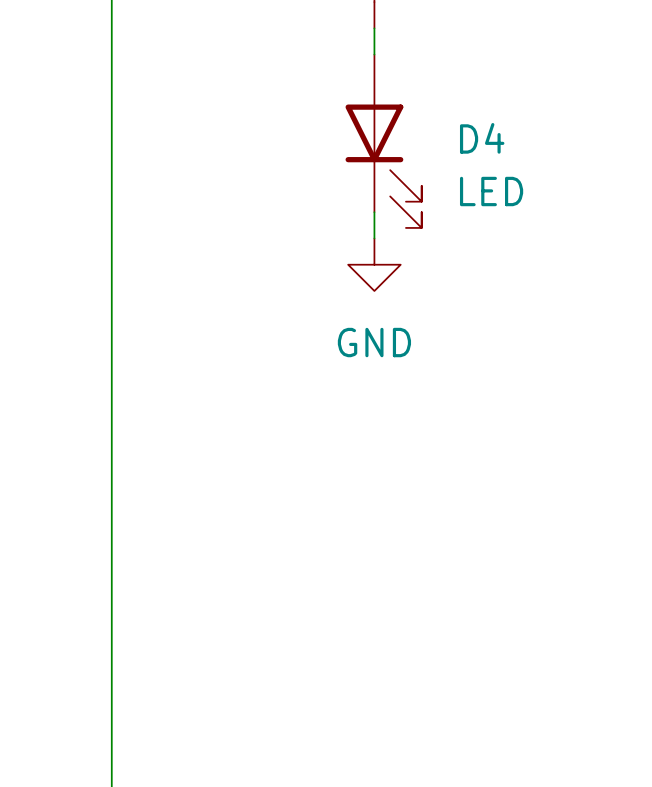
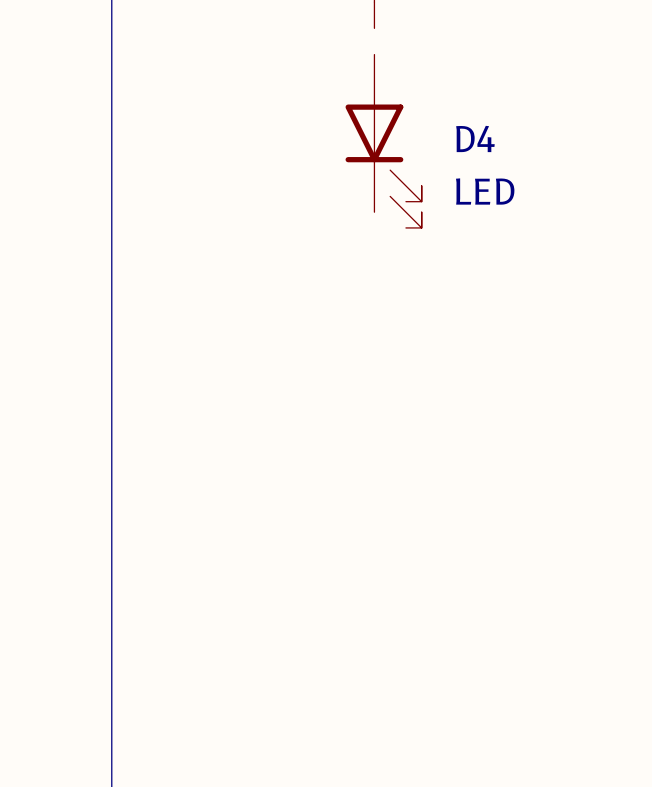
wire: (374, 28) (374, 54) -> none
wire: (374, 212) (374, 238) -> none
power symbol: GND (374, 264) -> none

